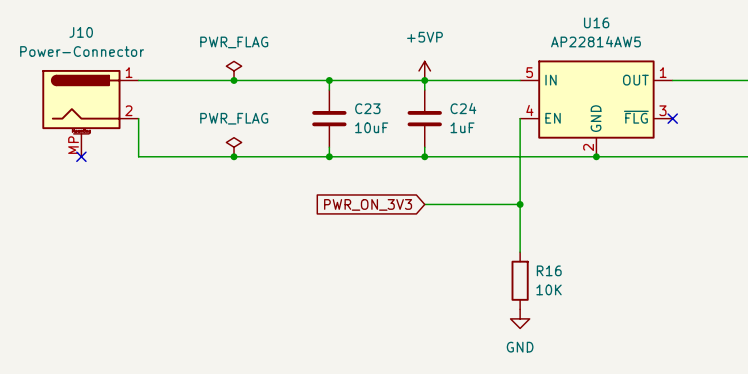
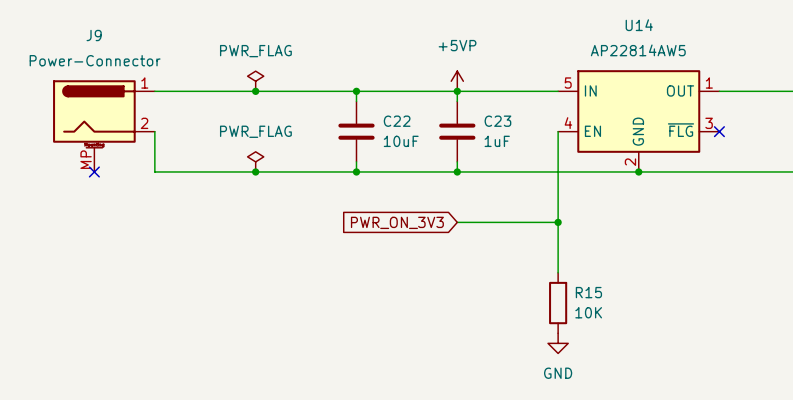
U16 name: U16 (596, 22) -> U14 (639, 25)
J10 name: J10 (81, 32) -> J9 (94, 35)
C23 name: C23 (367, 108) -> C22 (397, 121)
C24 name: C24 (463, 108) -> C23 (497, 121)
R16 name: R16 (549, 270) -> R15 (588, 292)

